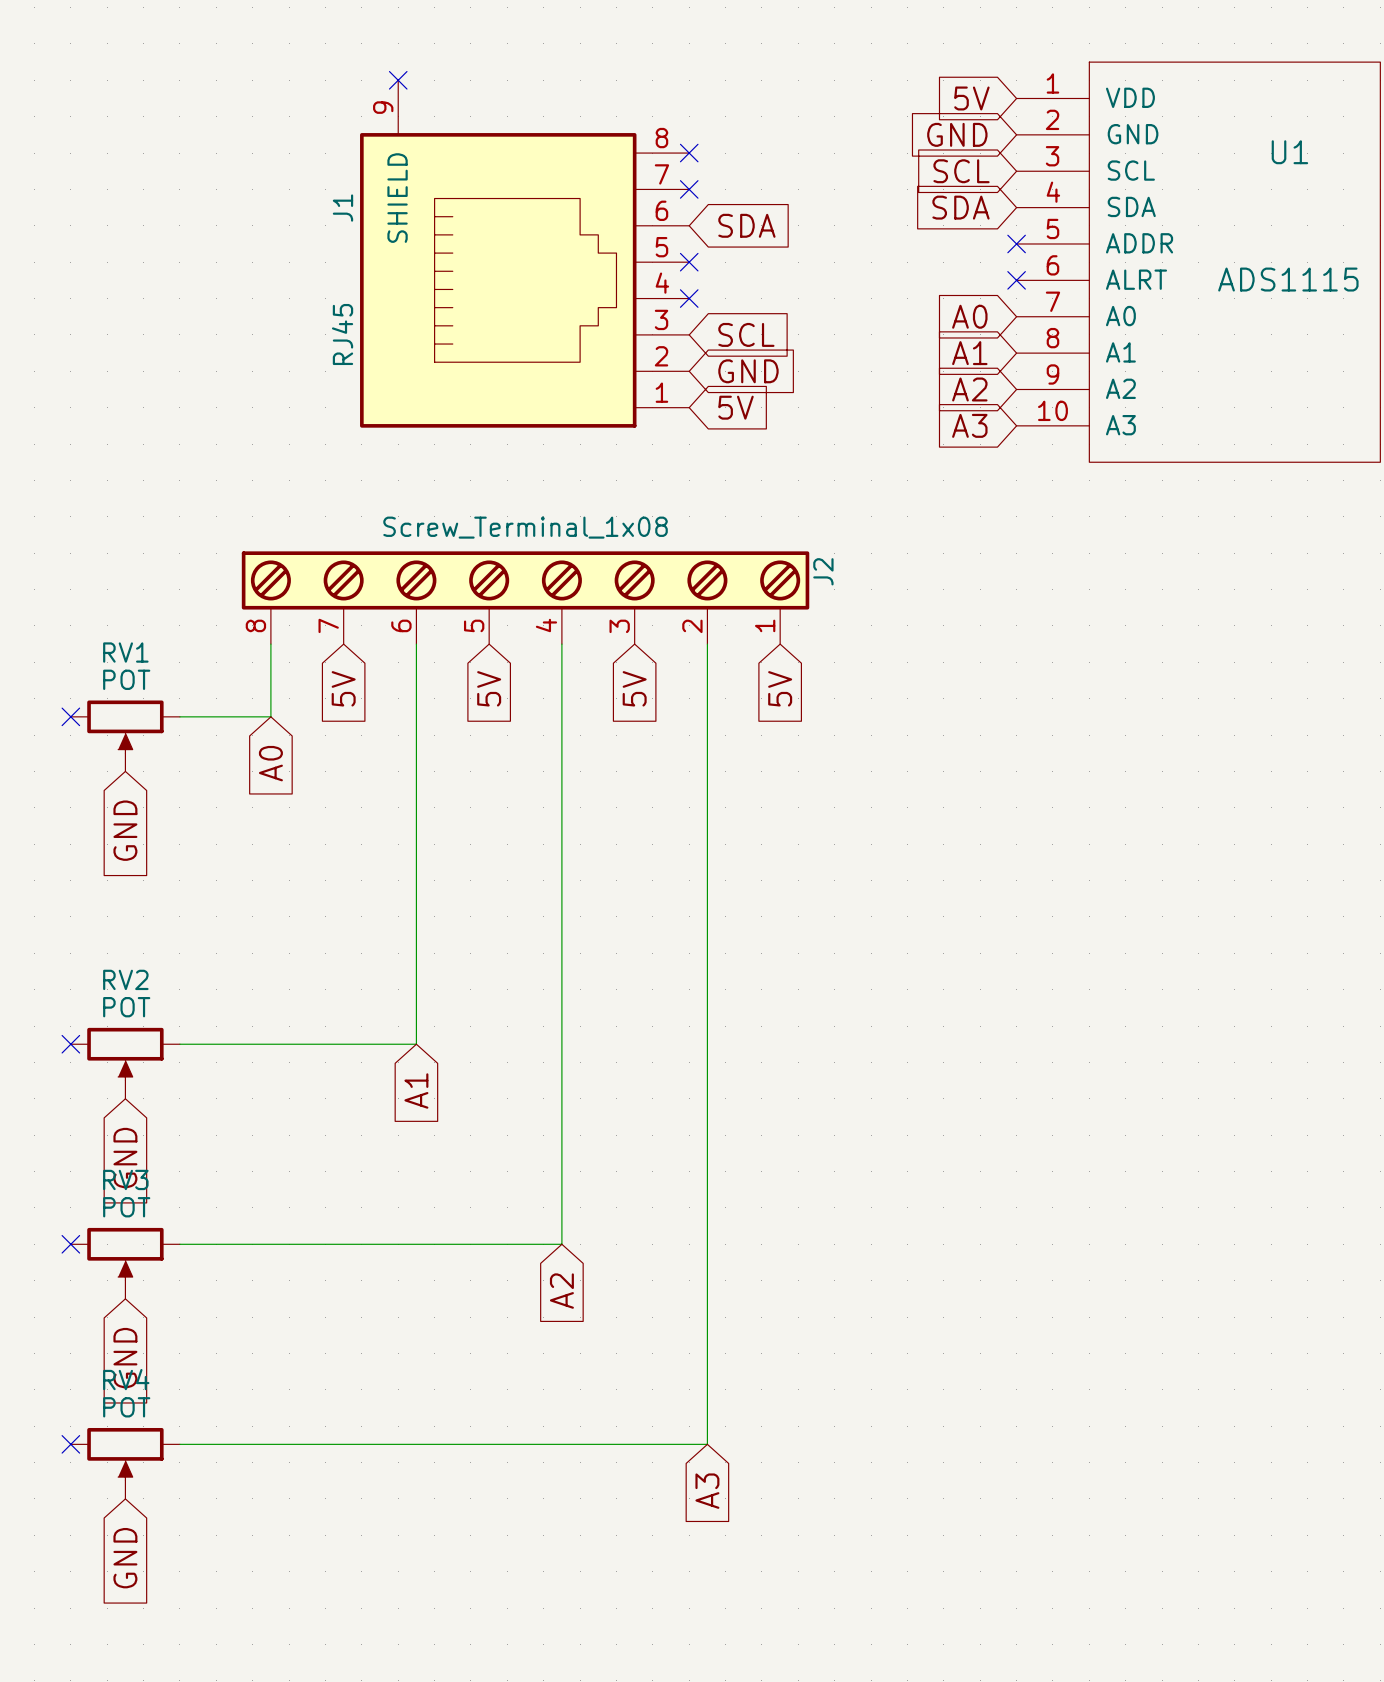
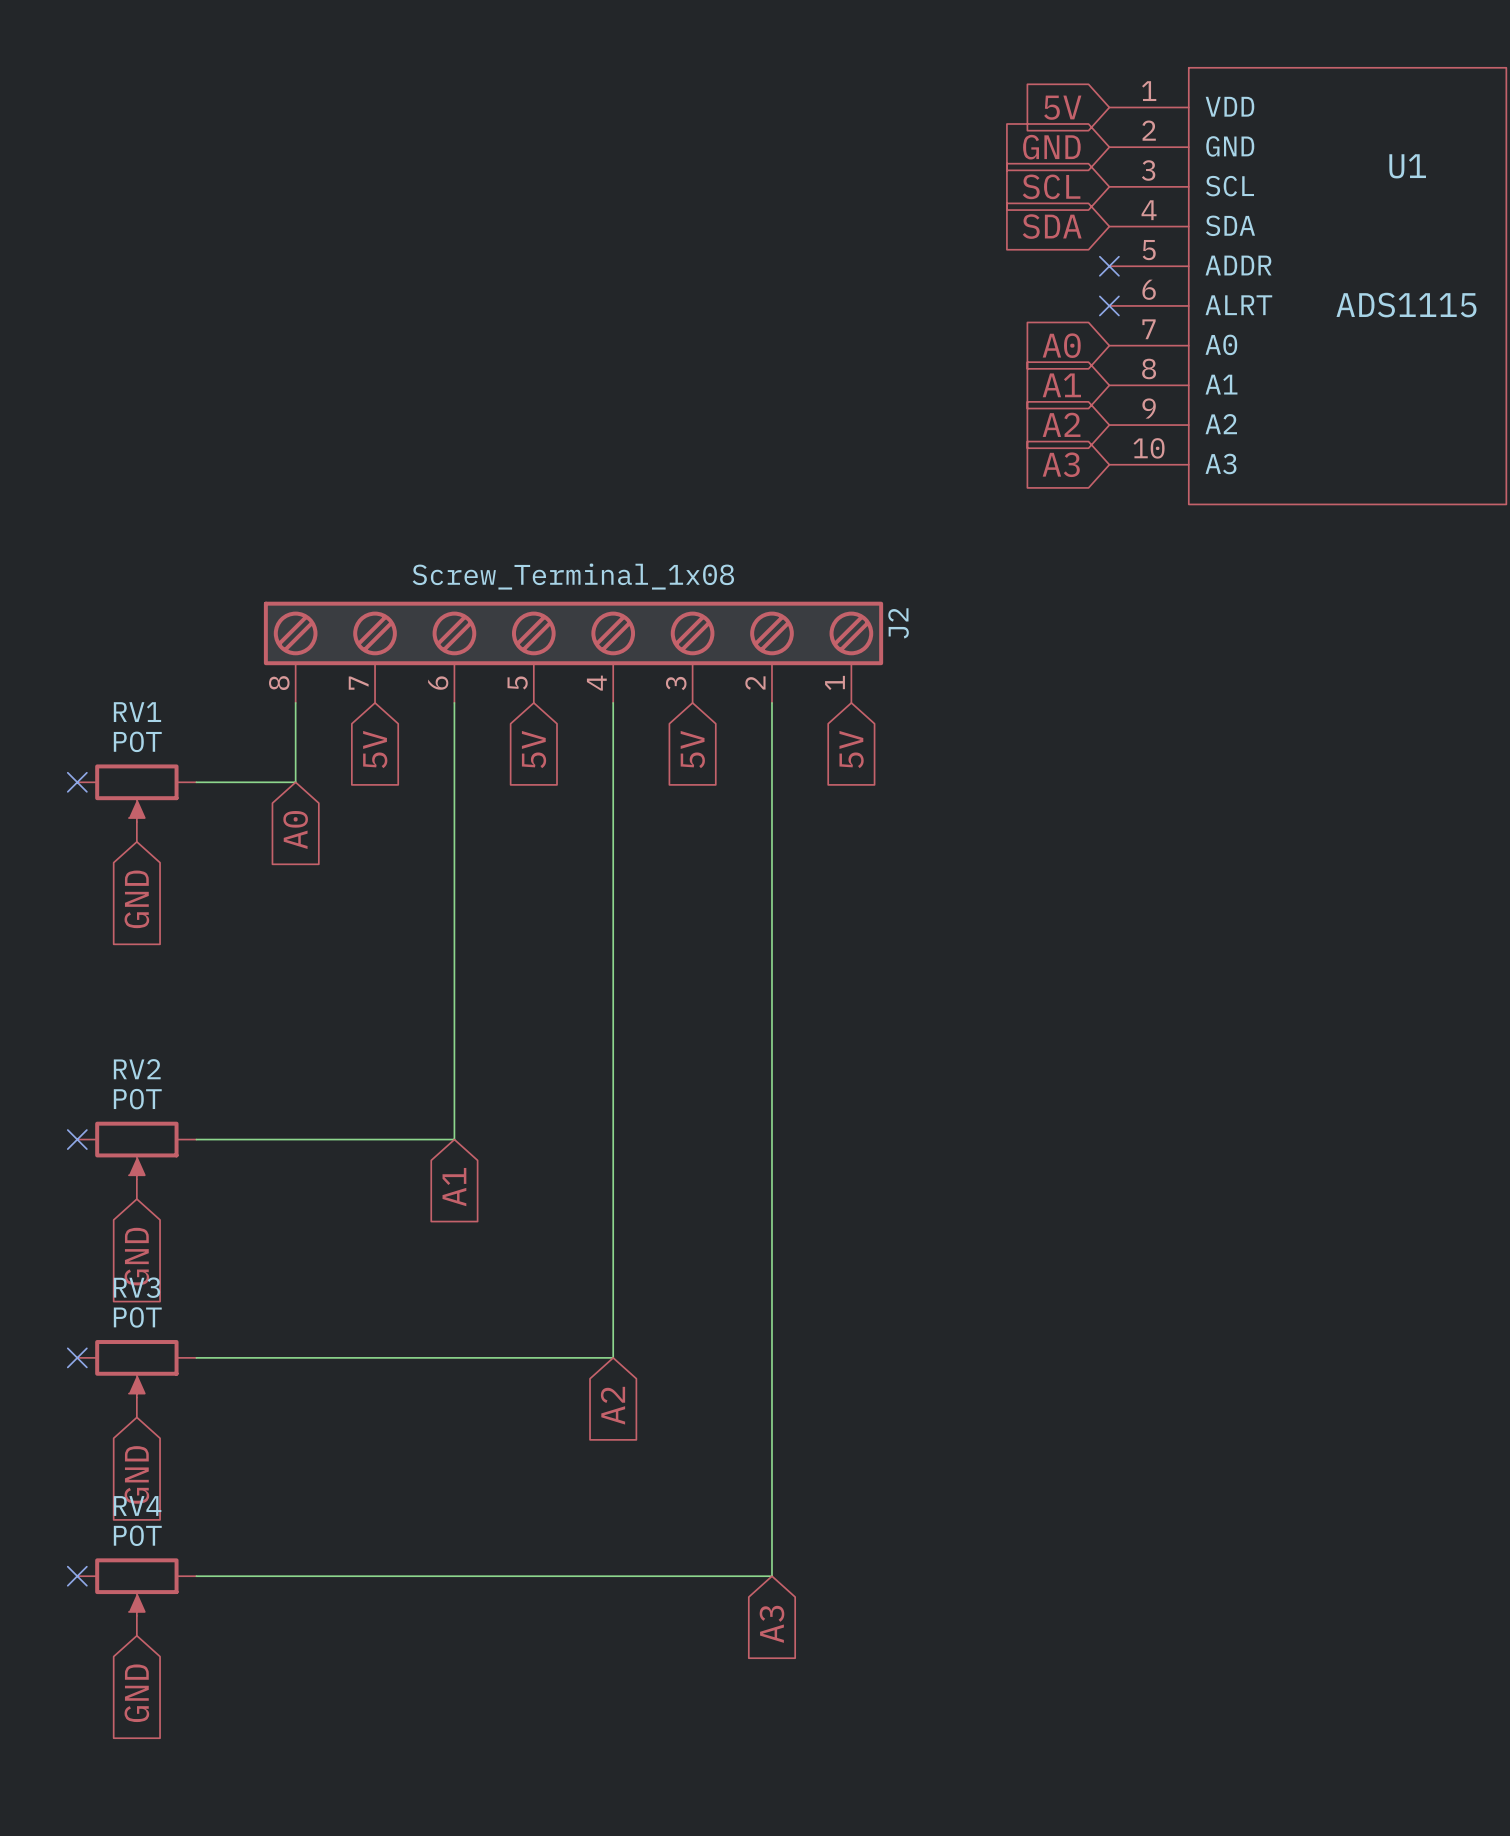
no-connect mark: (398, 80) -> none
no-connect mark: (689, 153) -> none
no-connect mark: (689, 189) -> none
global label: SDA (746, 225) -> none
J1: RJ45 (524, 253) -> none
no-connect mark: (689, 262) -> none
no-connect mark: (689, 298) -> none
global label: SCL (746, 334) -> none
global label: GND (748, 371) -> none
global label: 5V (736, 407) -> none

